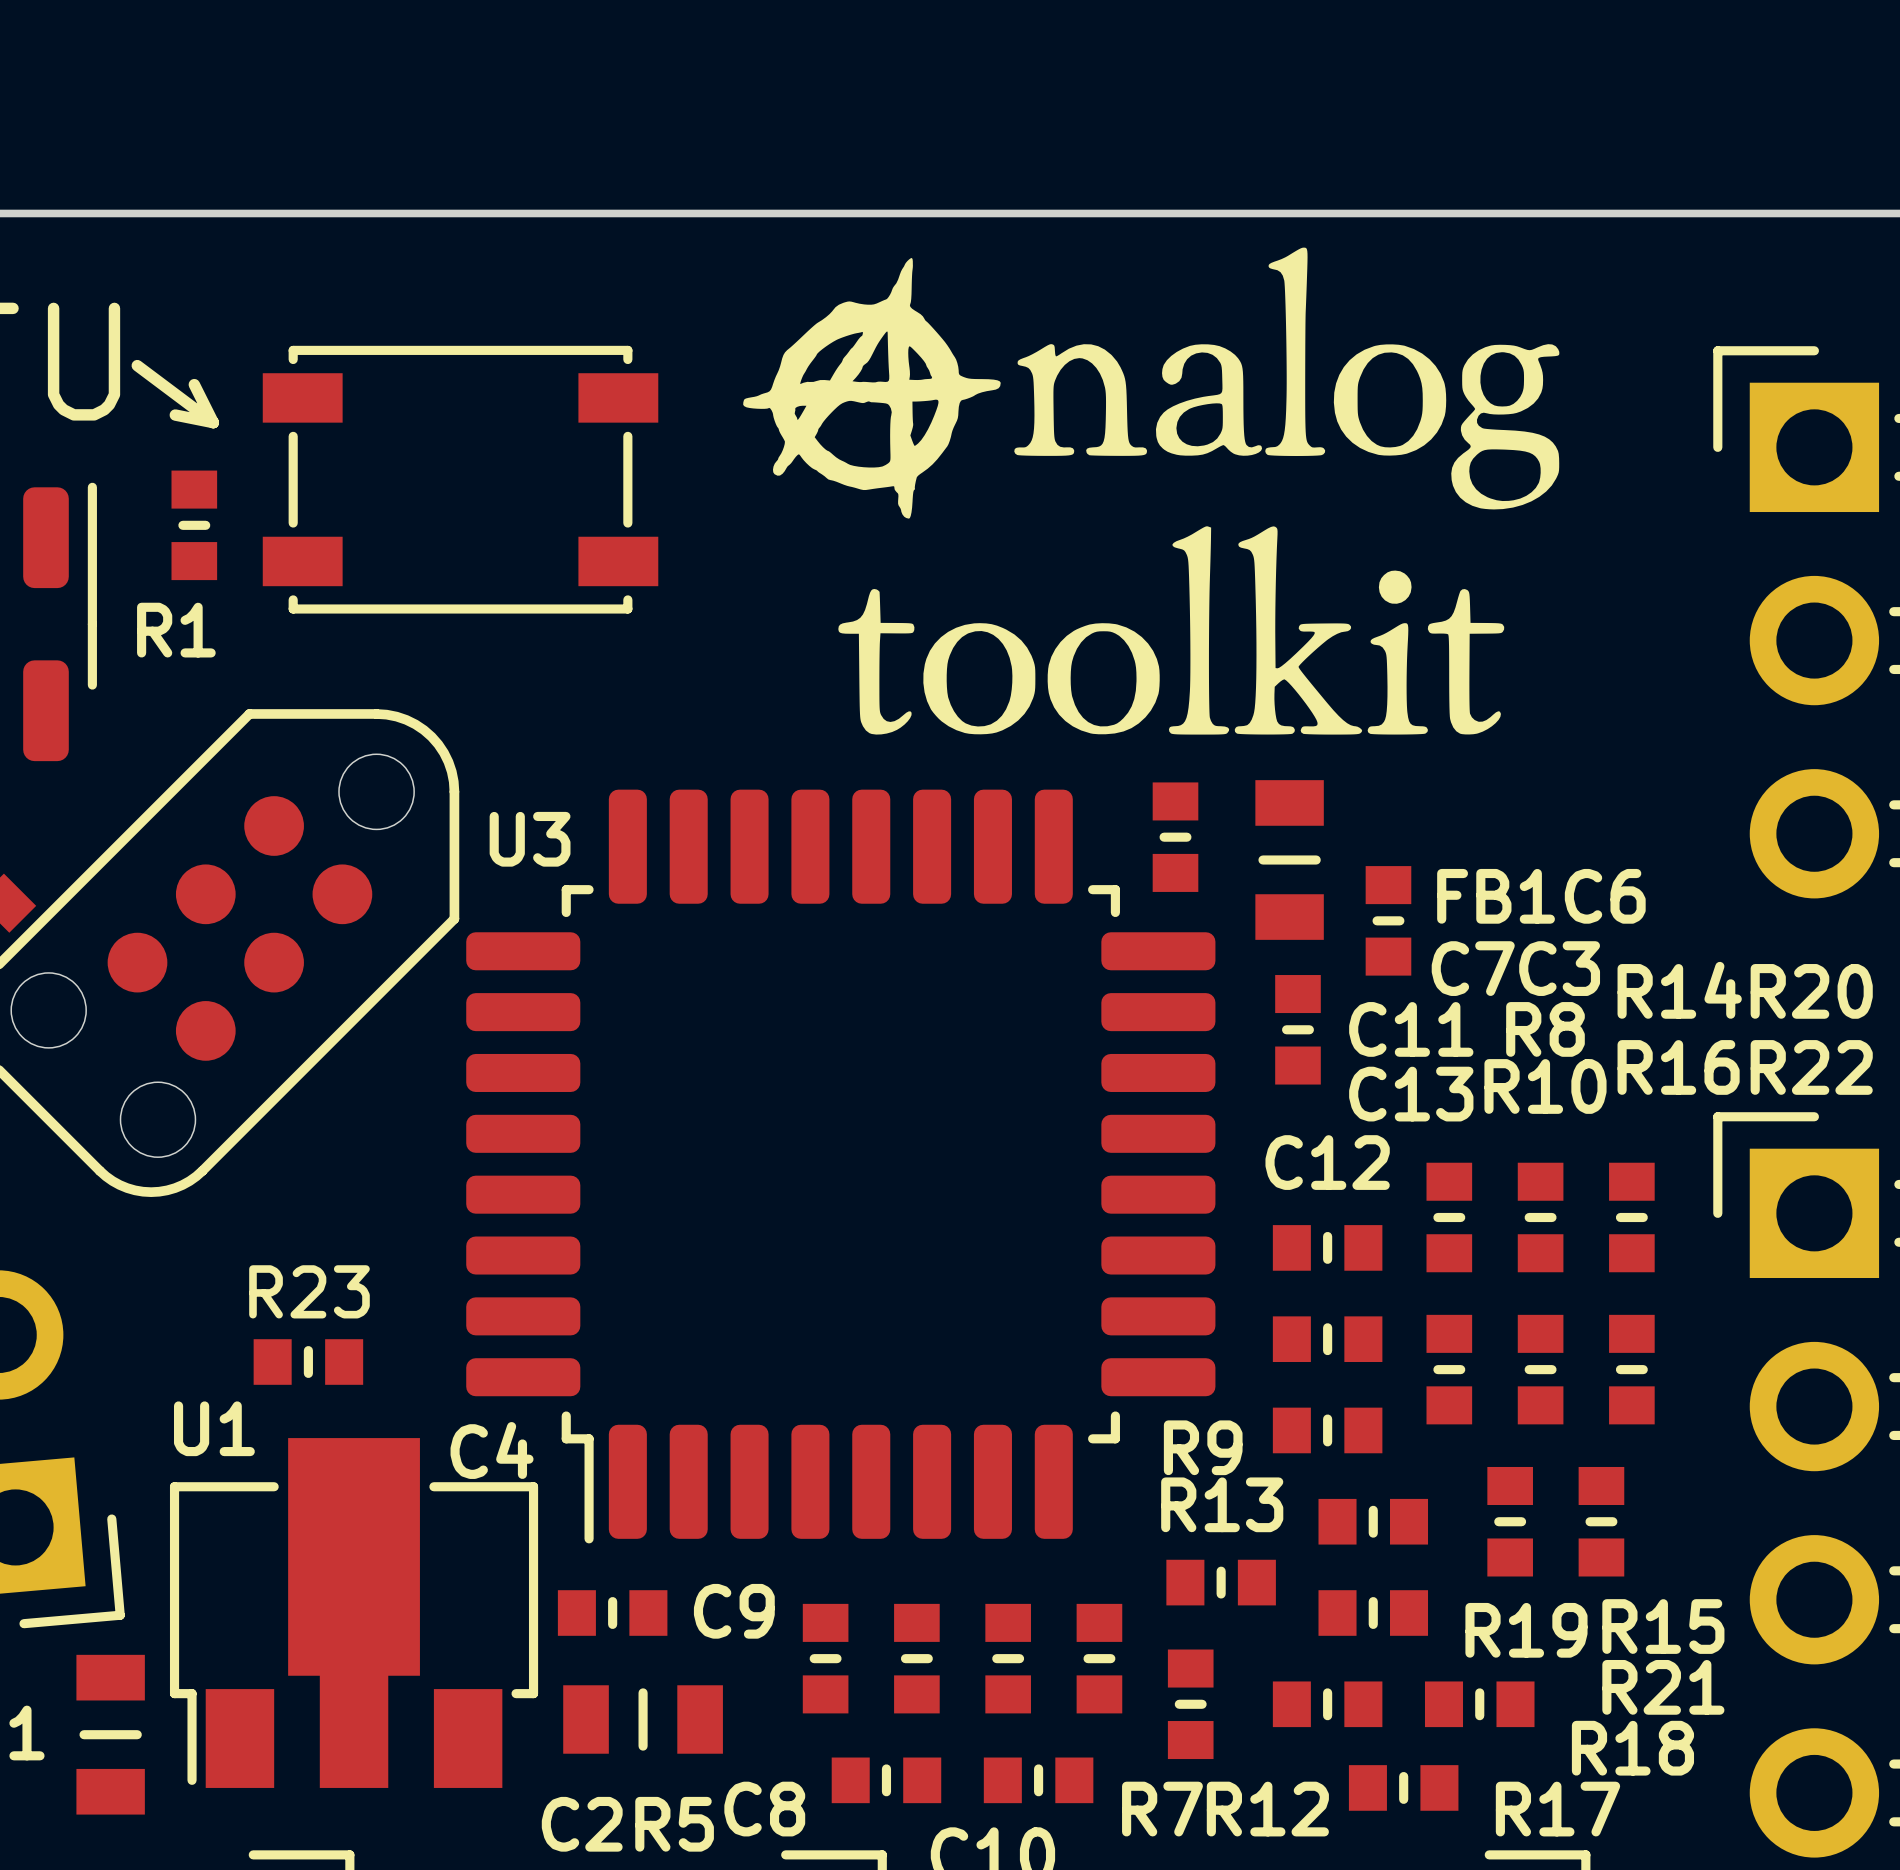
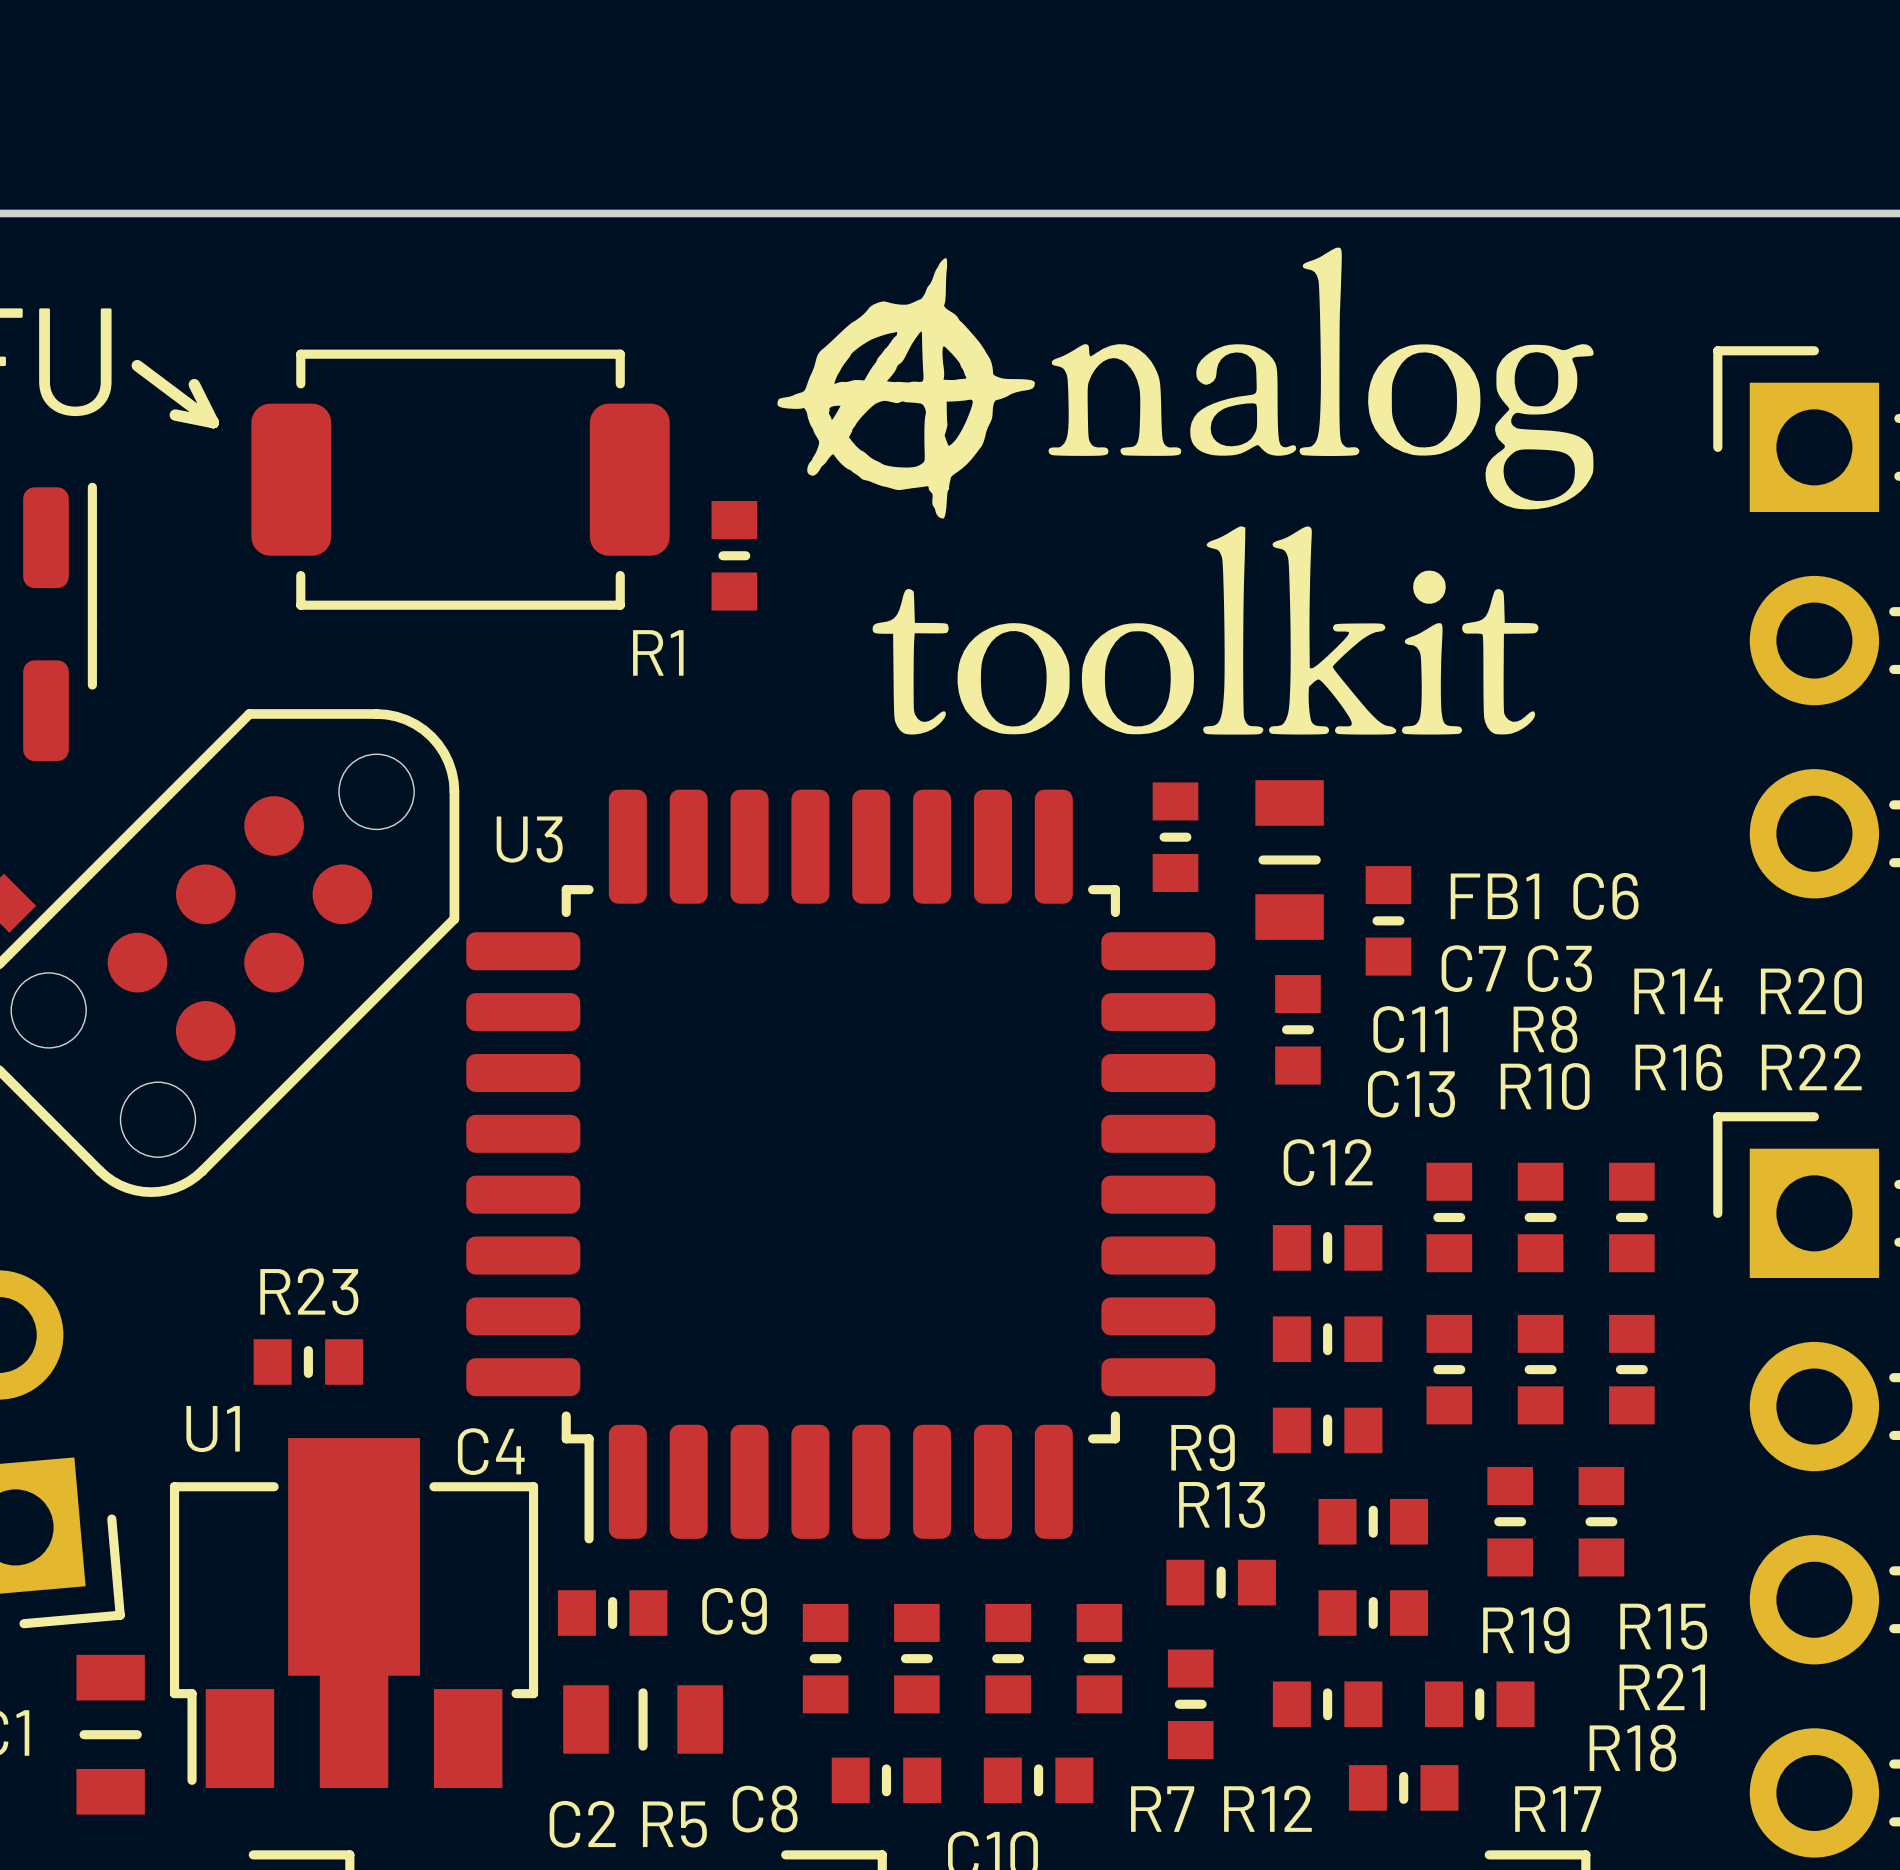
part footprint: [262, 345, 659, 614] -> [251, 349, 670, 610]
drawing position: (1151, 491) -> (1185, 491)
R1 position: (194, 525) -> (734, 555)
R1 name position: R1 (176, 630) -> R1 (658, 652)

